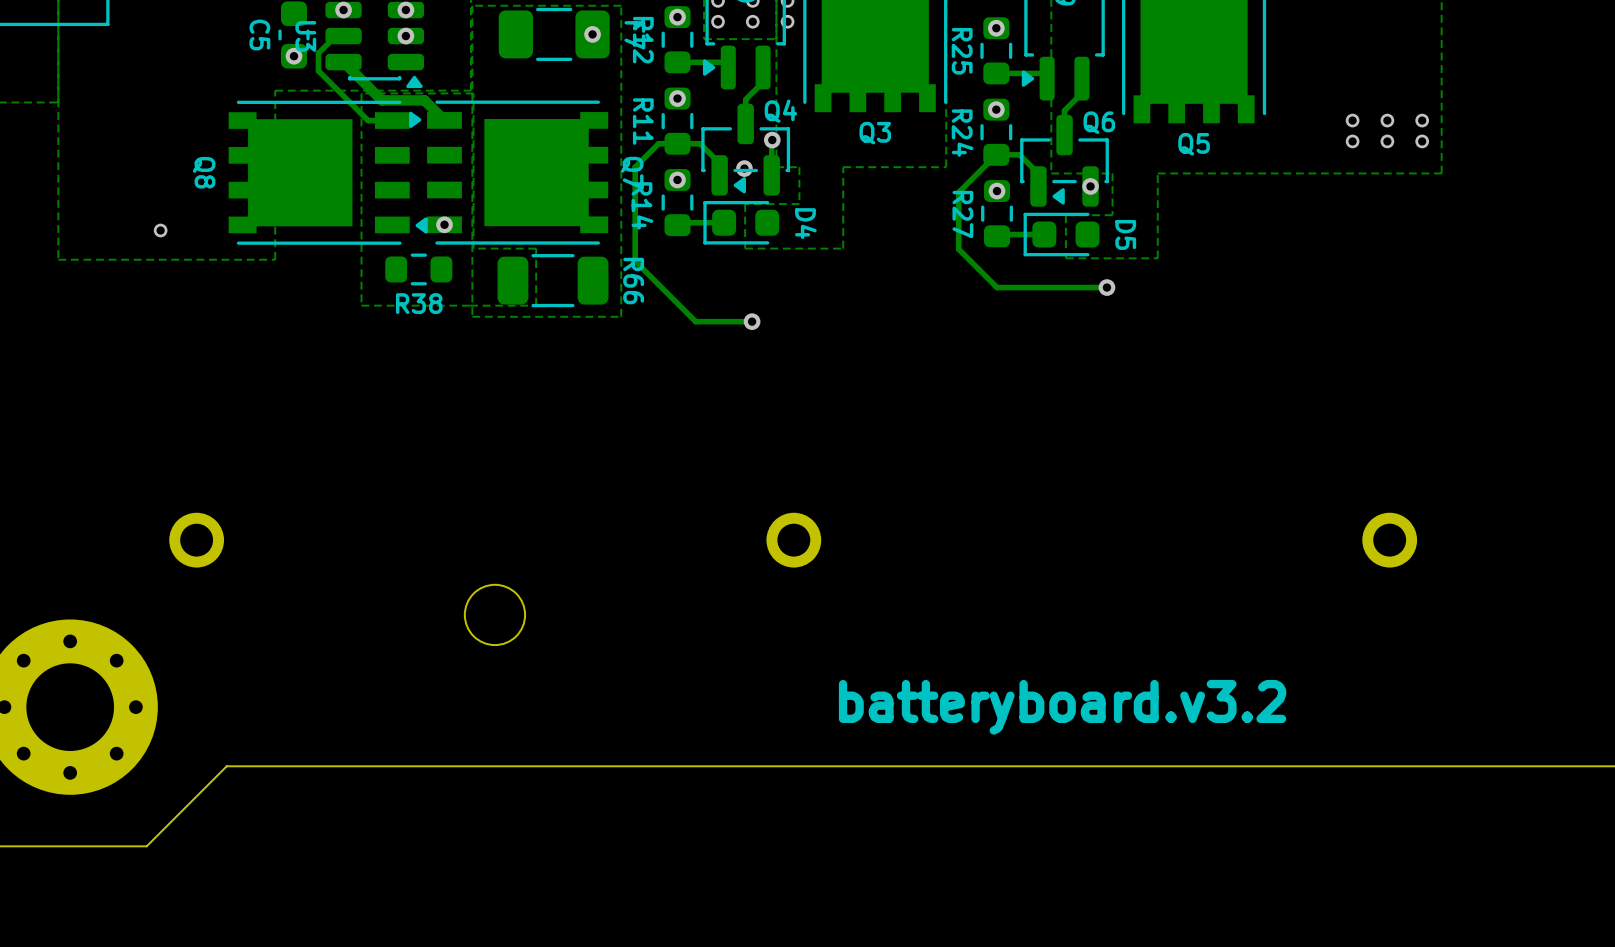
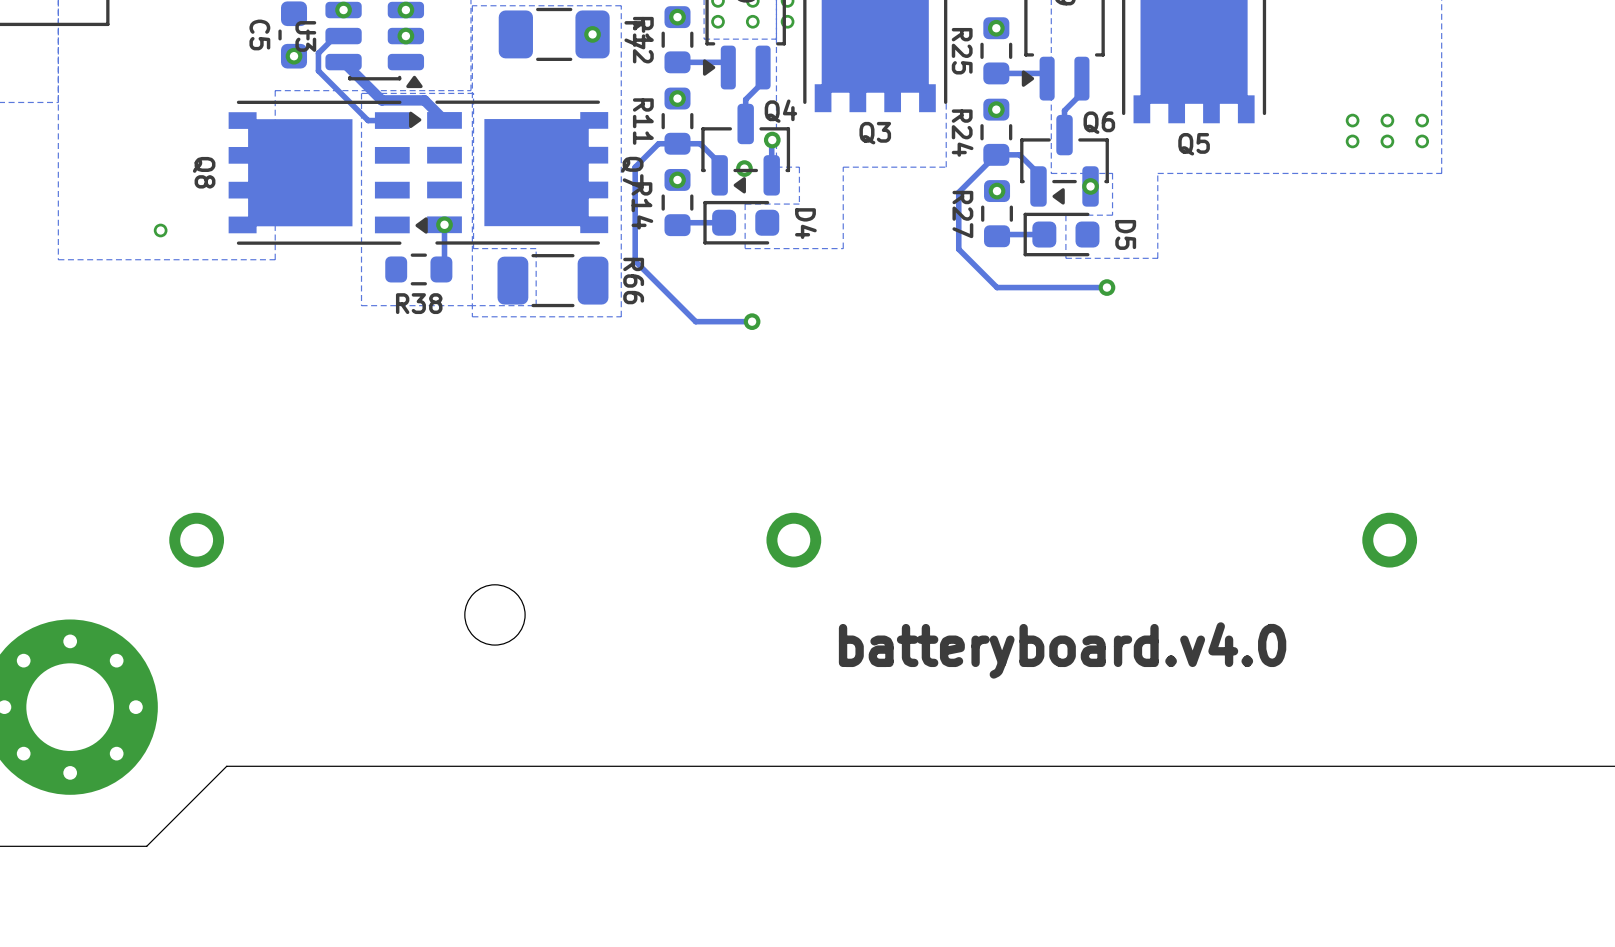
track: none -> (444, 224) (444, 266) (441, 269)
text: batteryboard.v3.2 (1062, 707) -> batteryboard.v4.0 (1062, 650)

